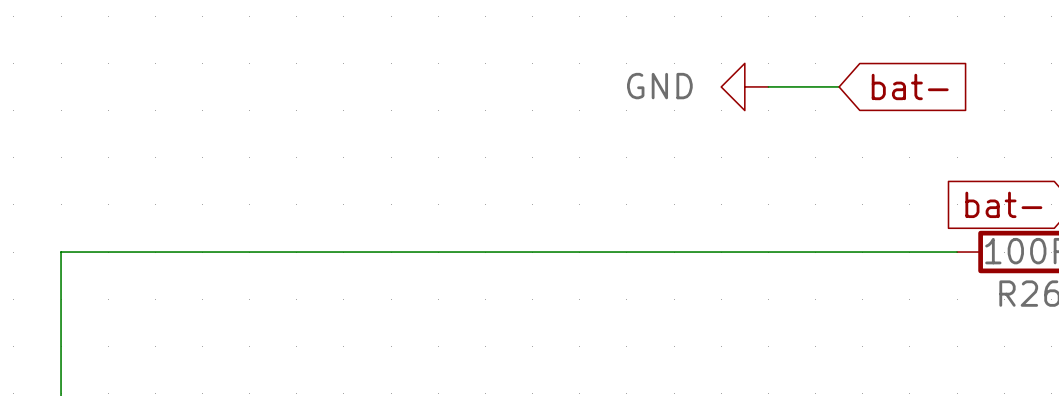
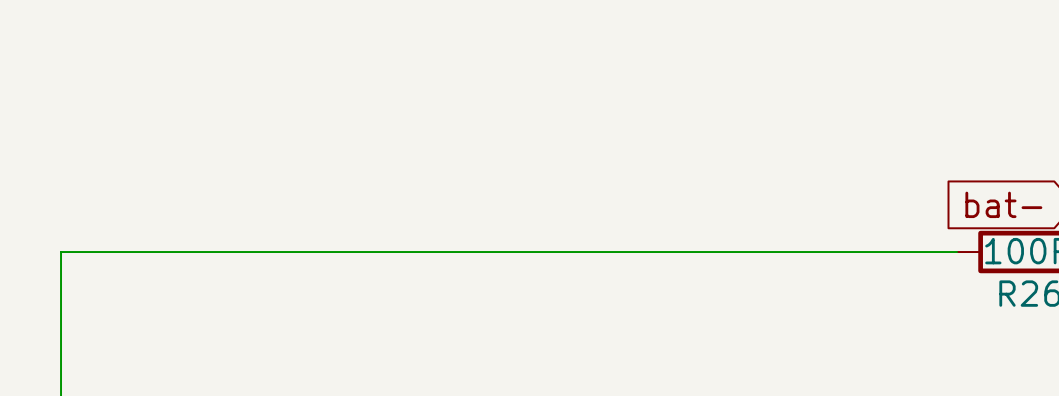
power symbol: GND (744, 86) -> none
wire: (768, 86) (839, 86) -> none
global label: bat- (910, 86) -> none

